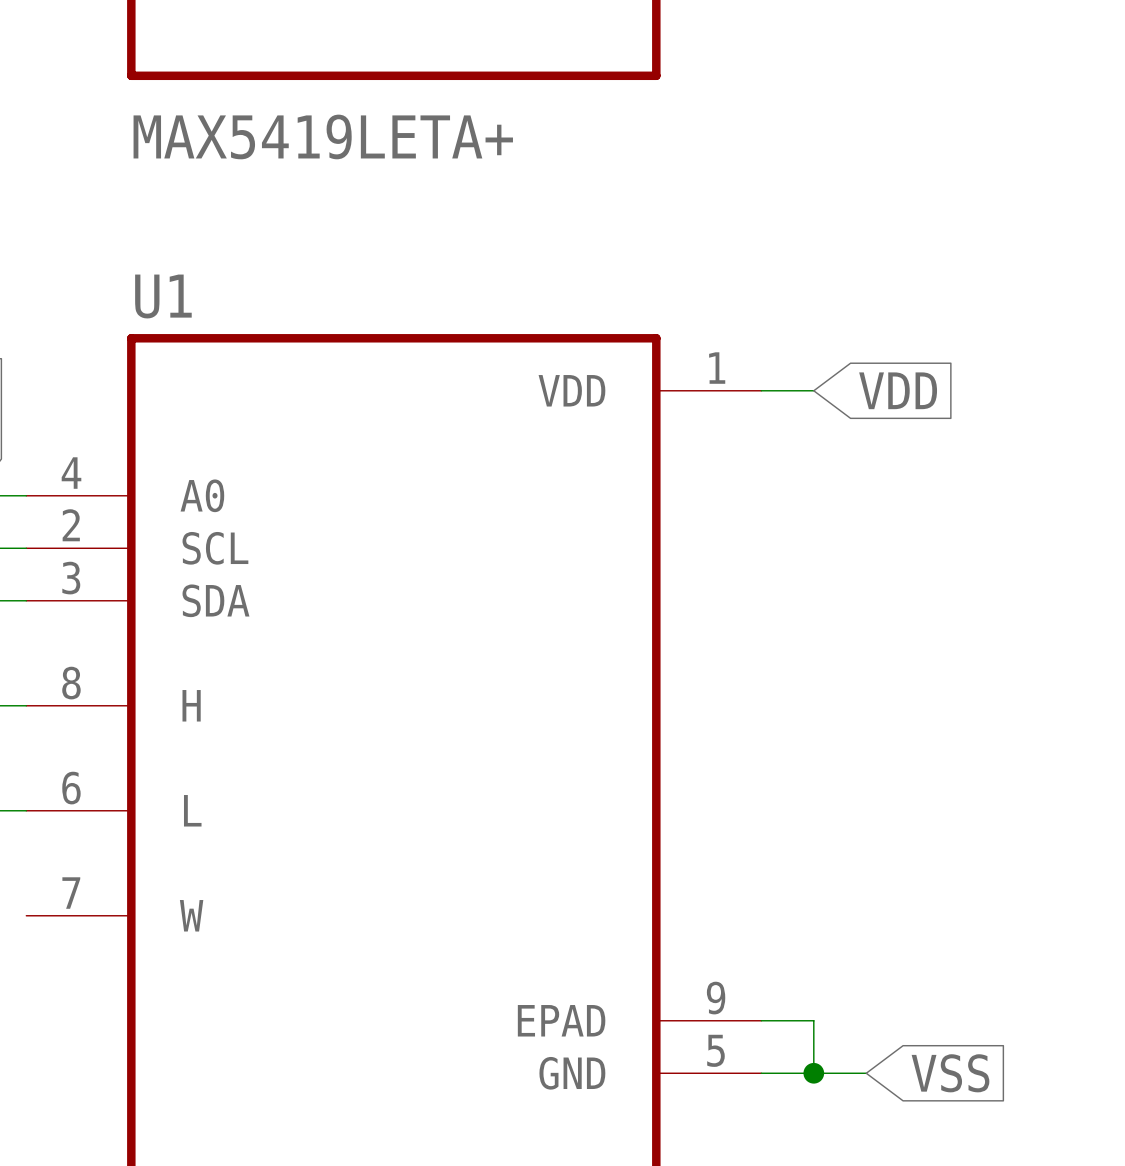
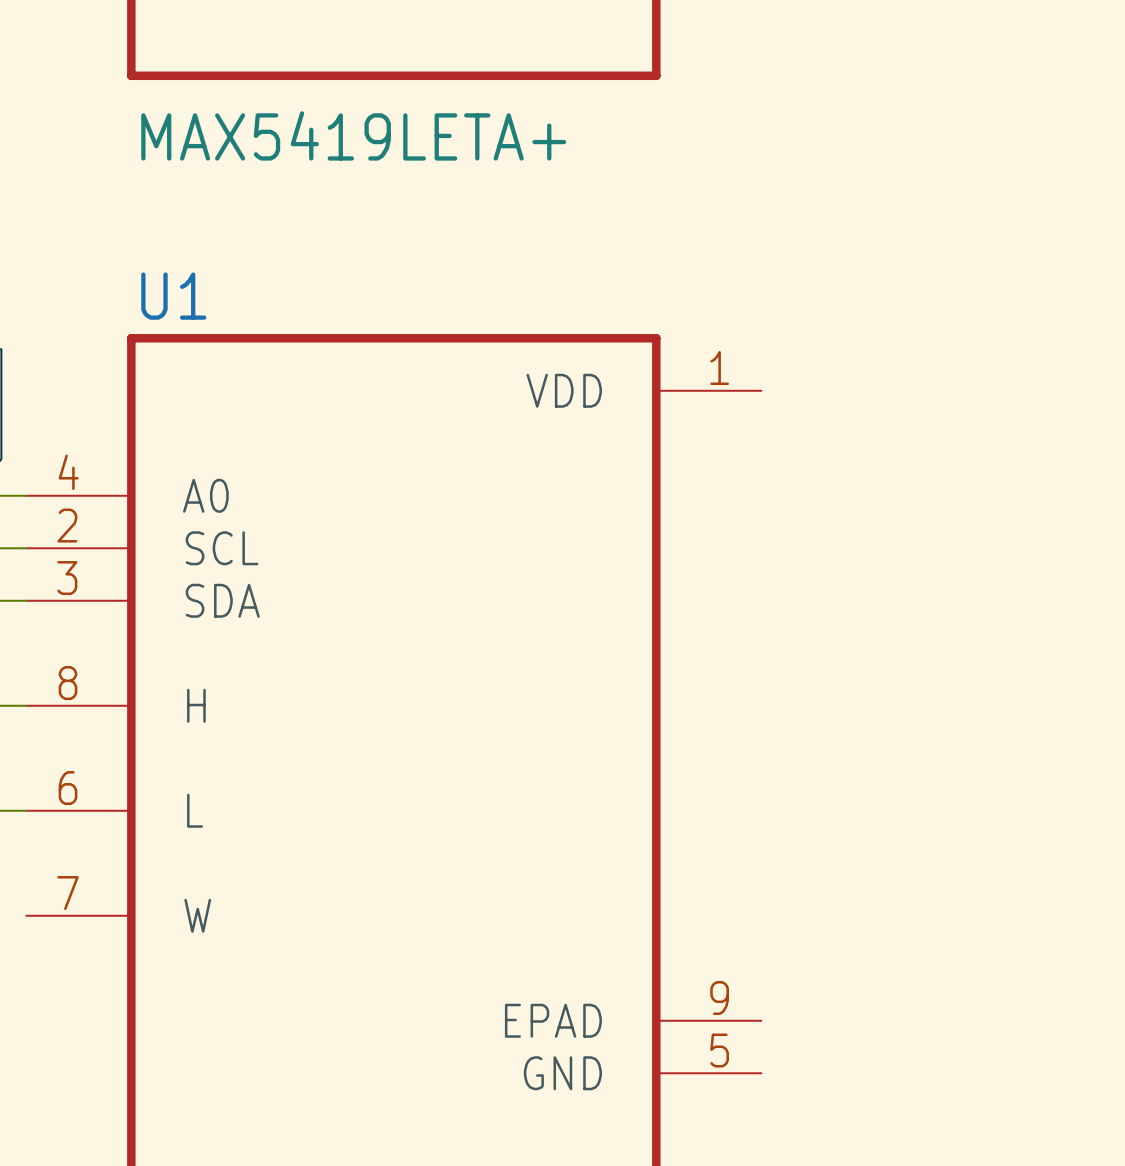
wire: (761, 390) (813, 390) -> none
global label: VDD (898, 390) -> none
wire: (761, 1020) (813, 1020) (813, 1073) -> none
wire: (761, 1073) (866, 1073) -> none
junction: (813, 1073) -> none
global label: VSS (950, 1073) -> none

